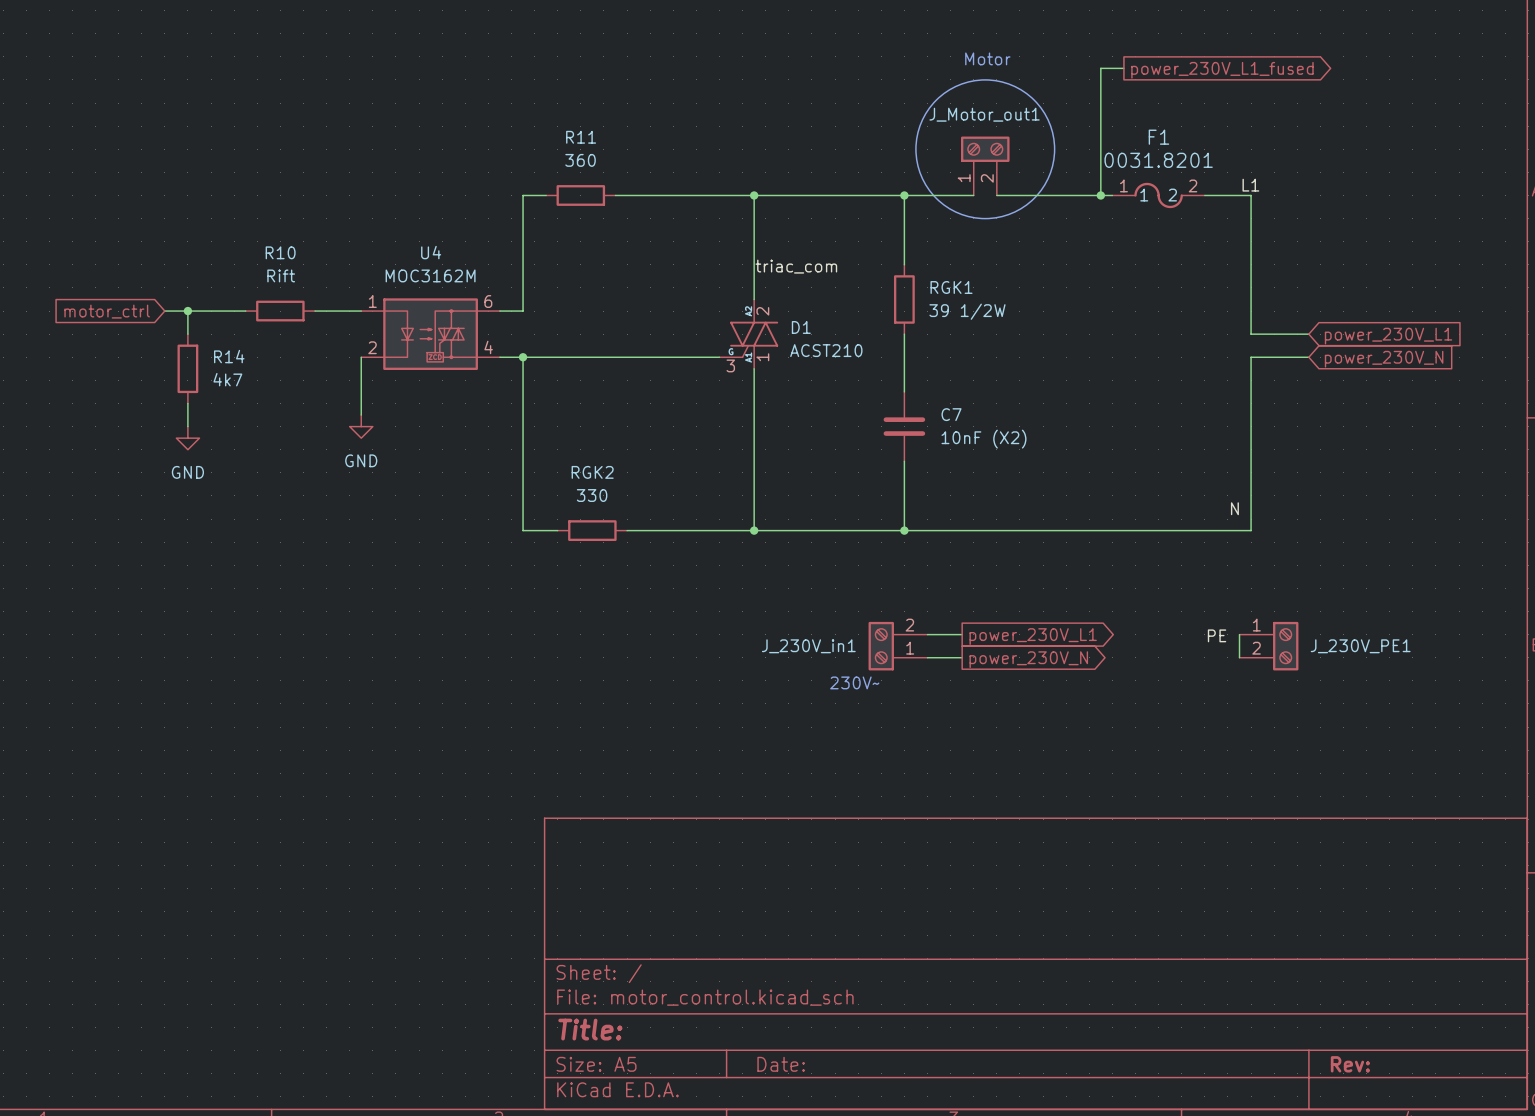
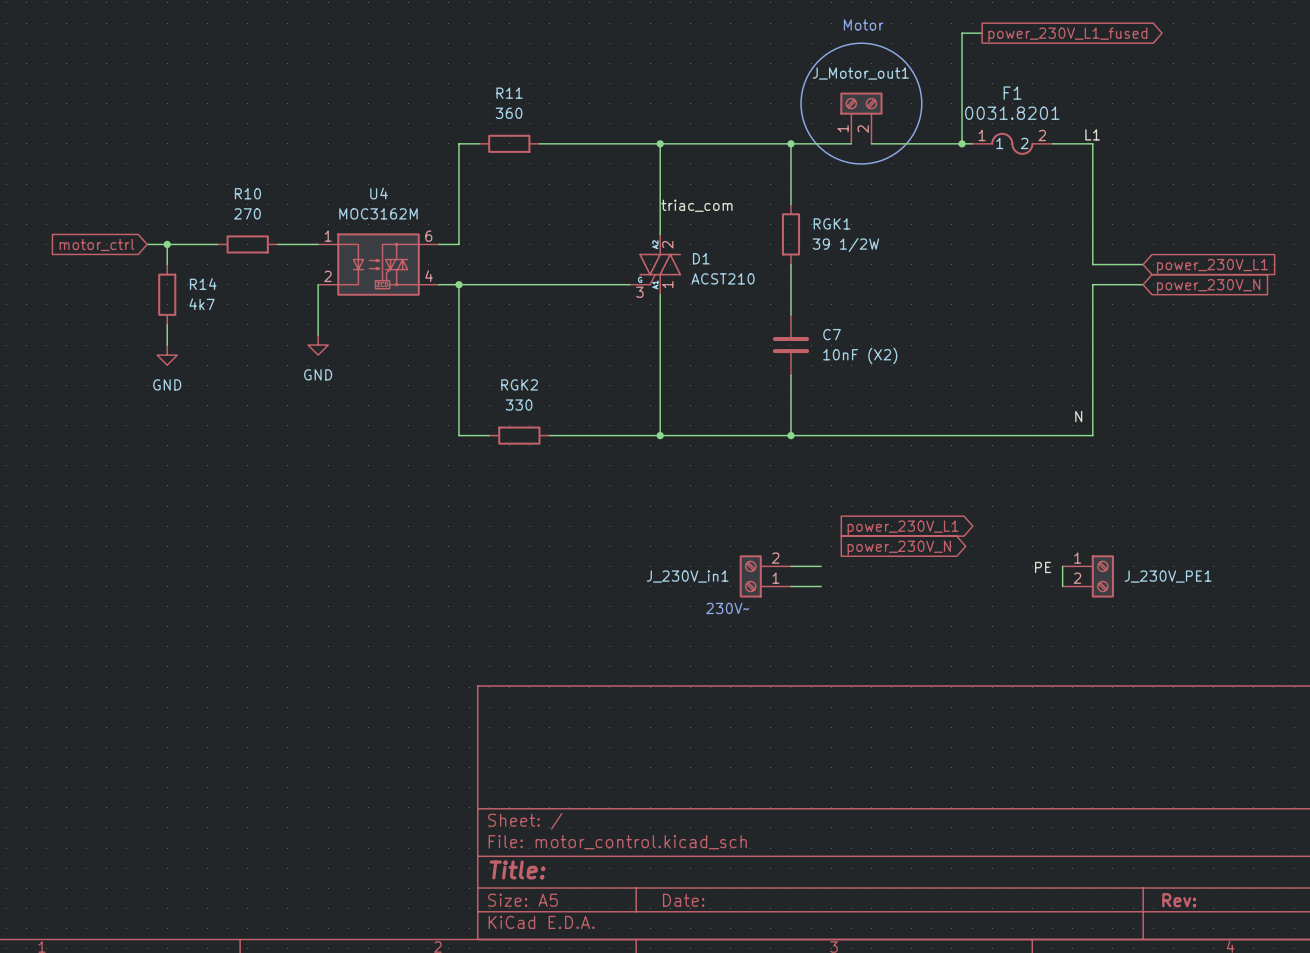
R10 value: Rift (281, 275) -> 270 (247, 213)
wire: (927, 634) (962, 634) -> (790, 566) (821, 566)
wire: (1239, 634) (1239, 657) -> (1062, 566) (1062, 586)
label position: PE (1217, 635) -> PE (1043, 567)
J_230V_in1 position: (898, 646) -> (765, 576)
J_230V_PE1 position: (1268, 646) -> (1088, 576)
wire: (927, 657) (962, 657) -> (790, 586) (821, 586)
text position: 230V~ (854, 682) -> 230V~ (727, 608)

